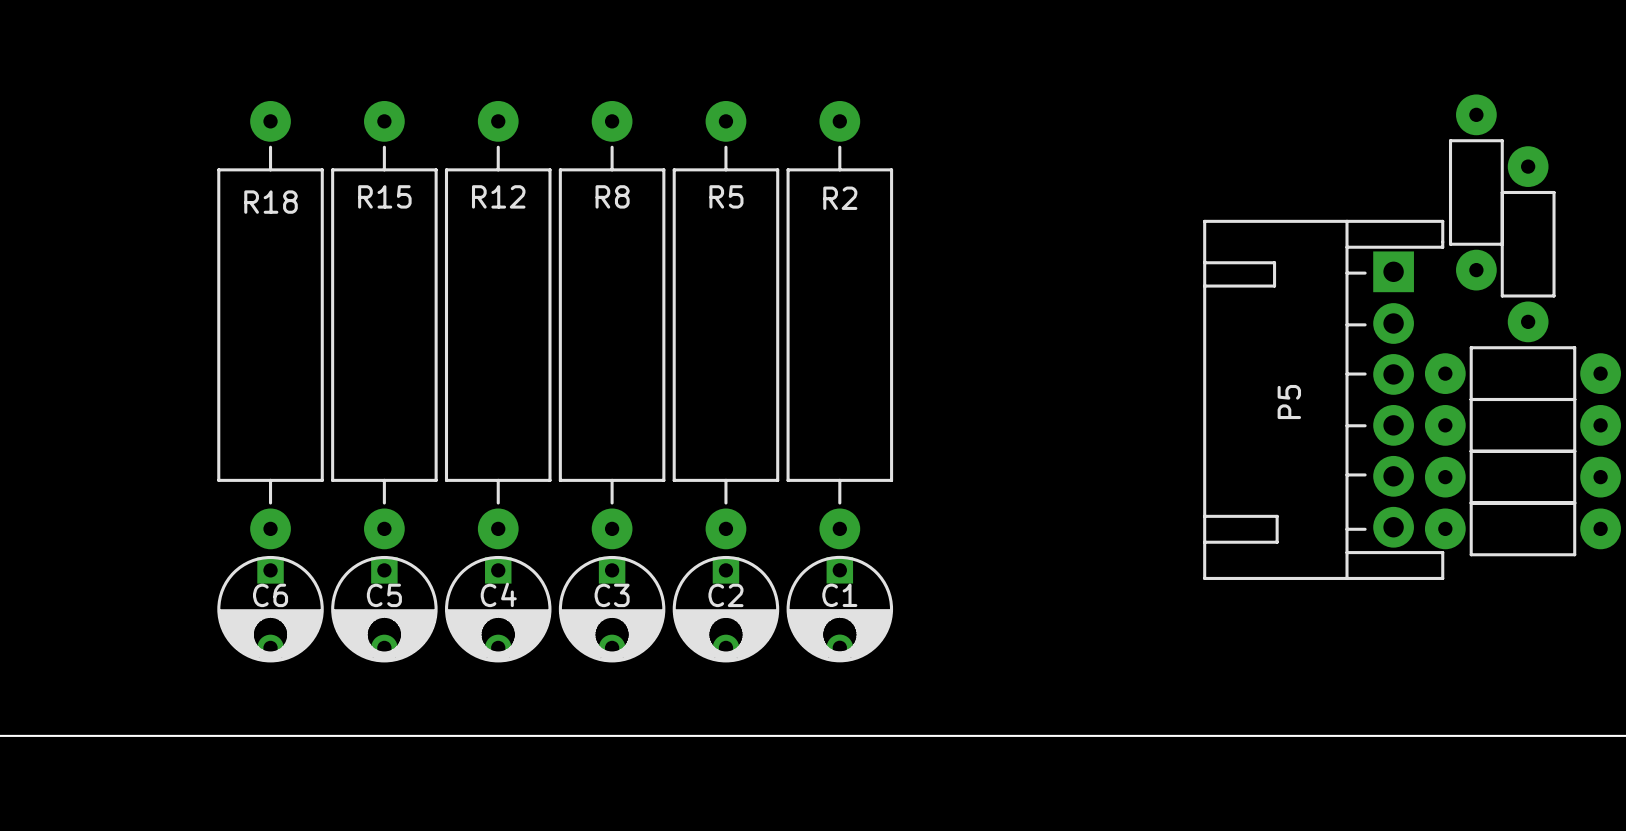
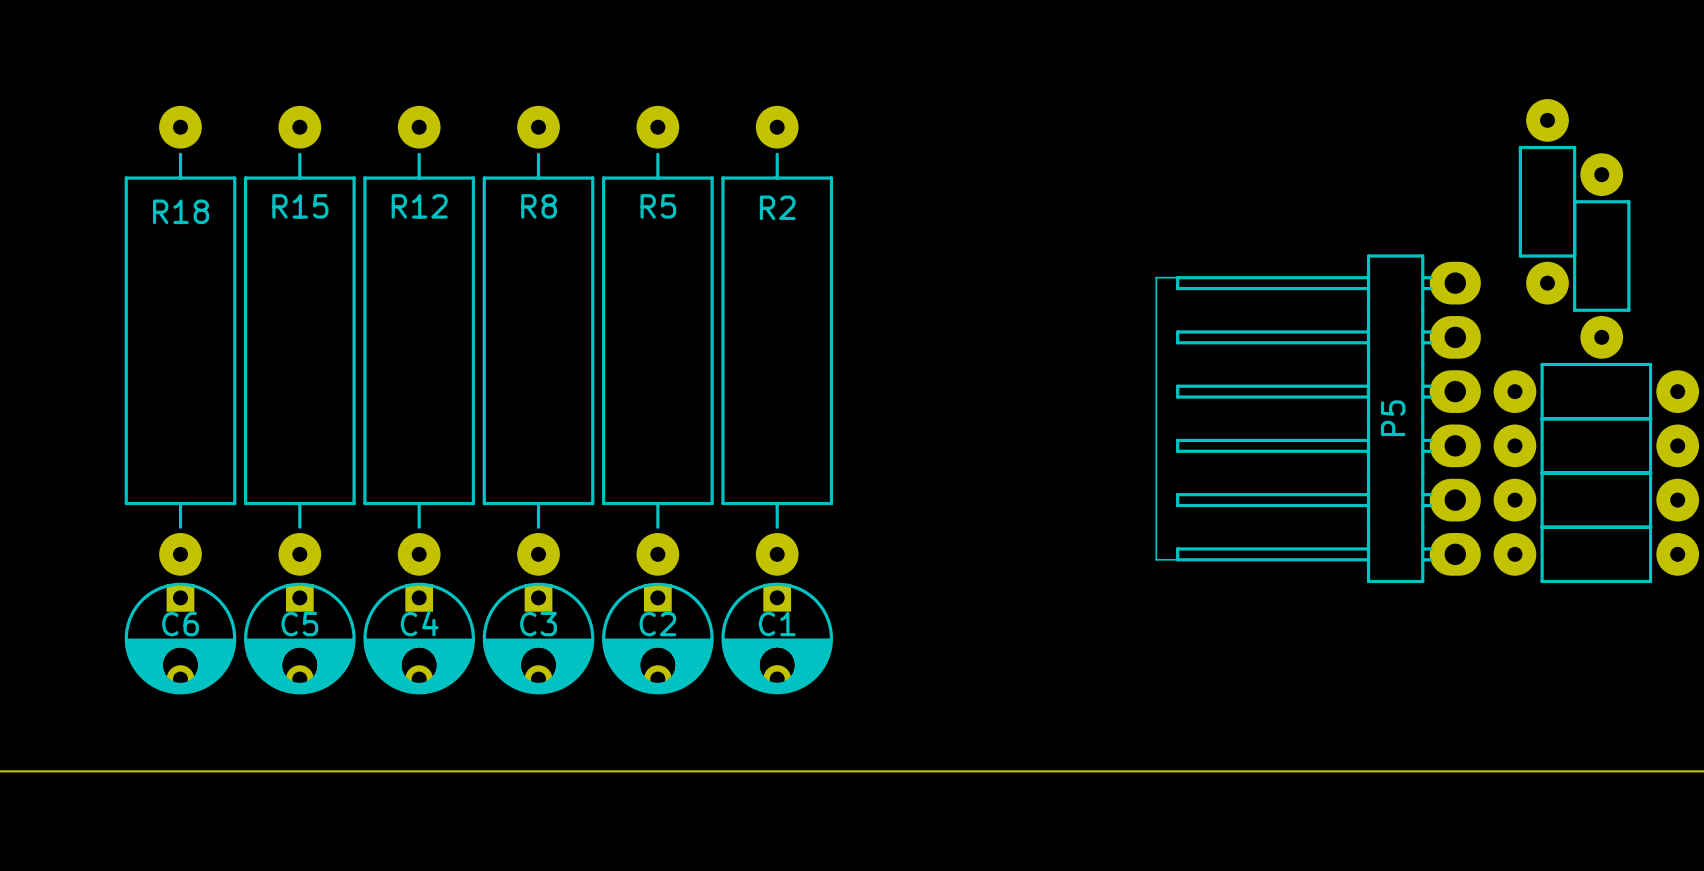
P5 footprint: [1203, 219, 1445, 580] -> [1155, 254, 1481, 584]
R18 position: (270, 325) -> (180, 340)
R15 position: (384, 325) -> (299, 340)
R12 position: (498, 325) -> (419, 340)
R8 position: (612, 325) -> (538, 340)
R5 position: (725, 325) -> (657, 340)
R2 position: (839, 325) -> (777, 340)
P5 name position: P5 (1289, 402) -> P5 (1393, 418)
C6 position: (270, 609) -> (180, 638)
C5 position: (384, 609) -> (299, 638)
C4 position: (498, 609) -> (419, 638)
C3 position: (612, 609) -> (538, 638)
C2 position: (725, 609) -> (657, 638)
C1 position: (839, 609) -> (777, 638)

